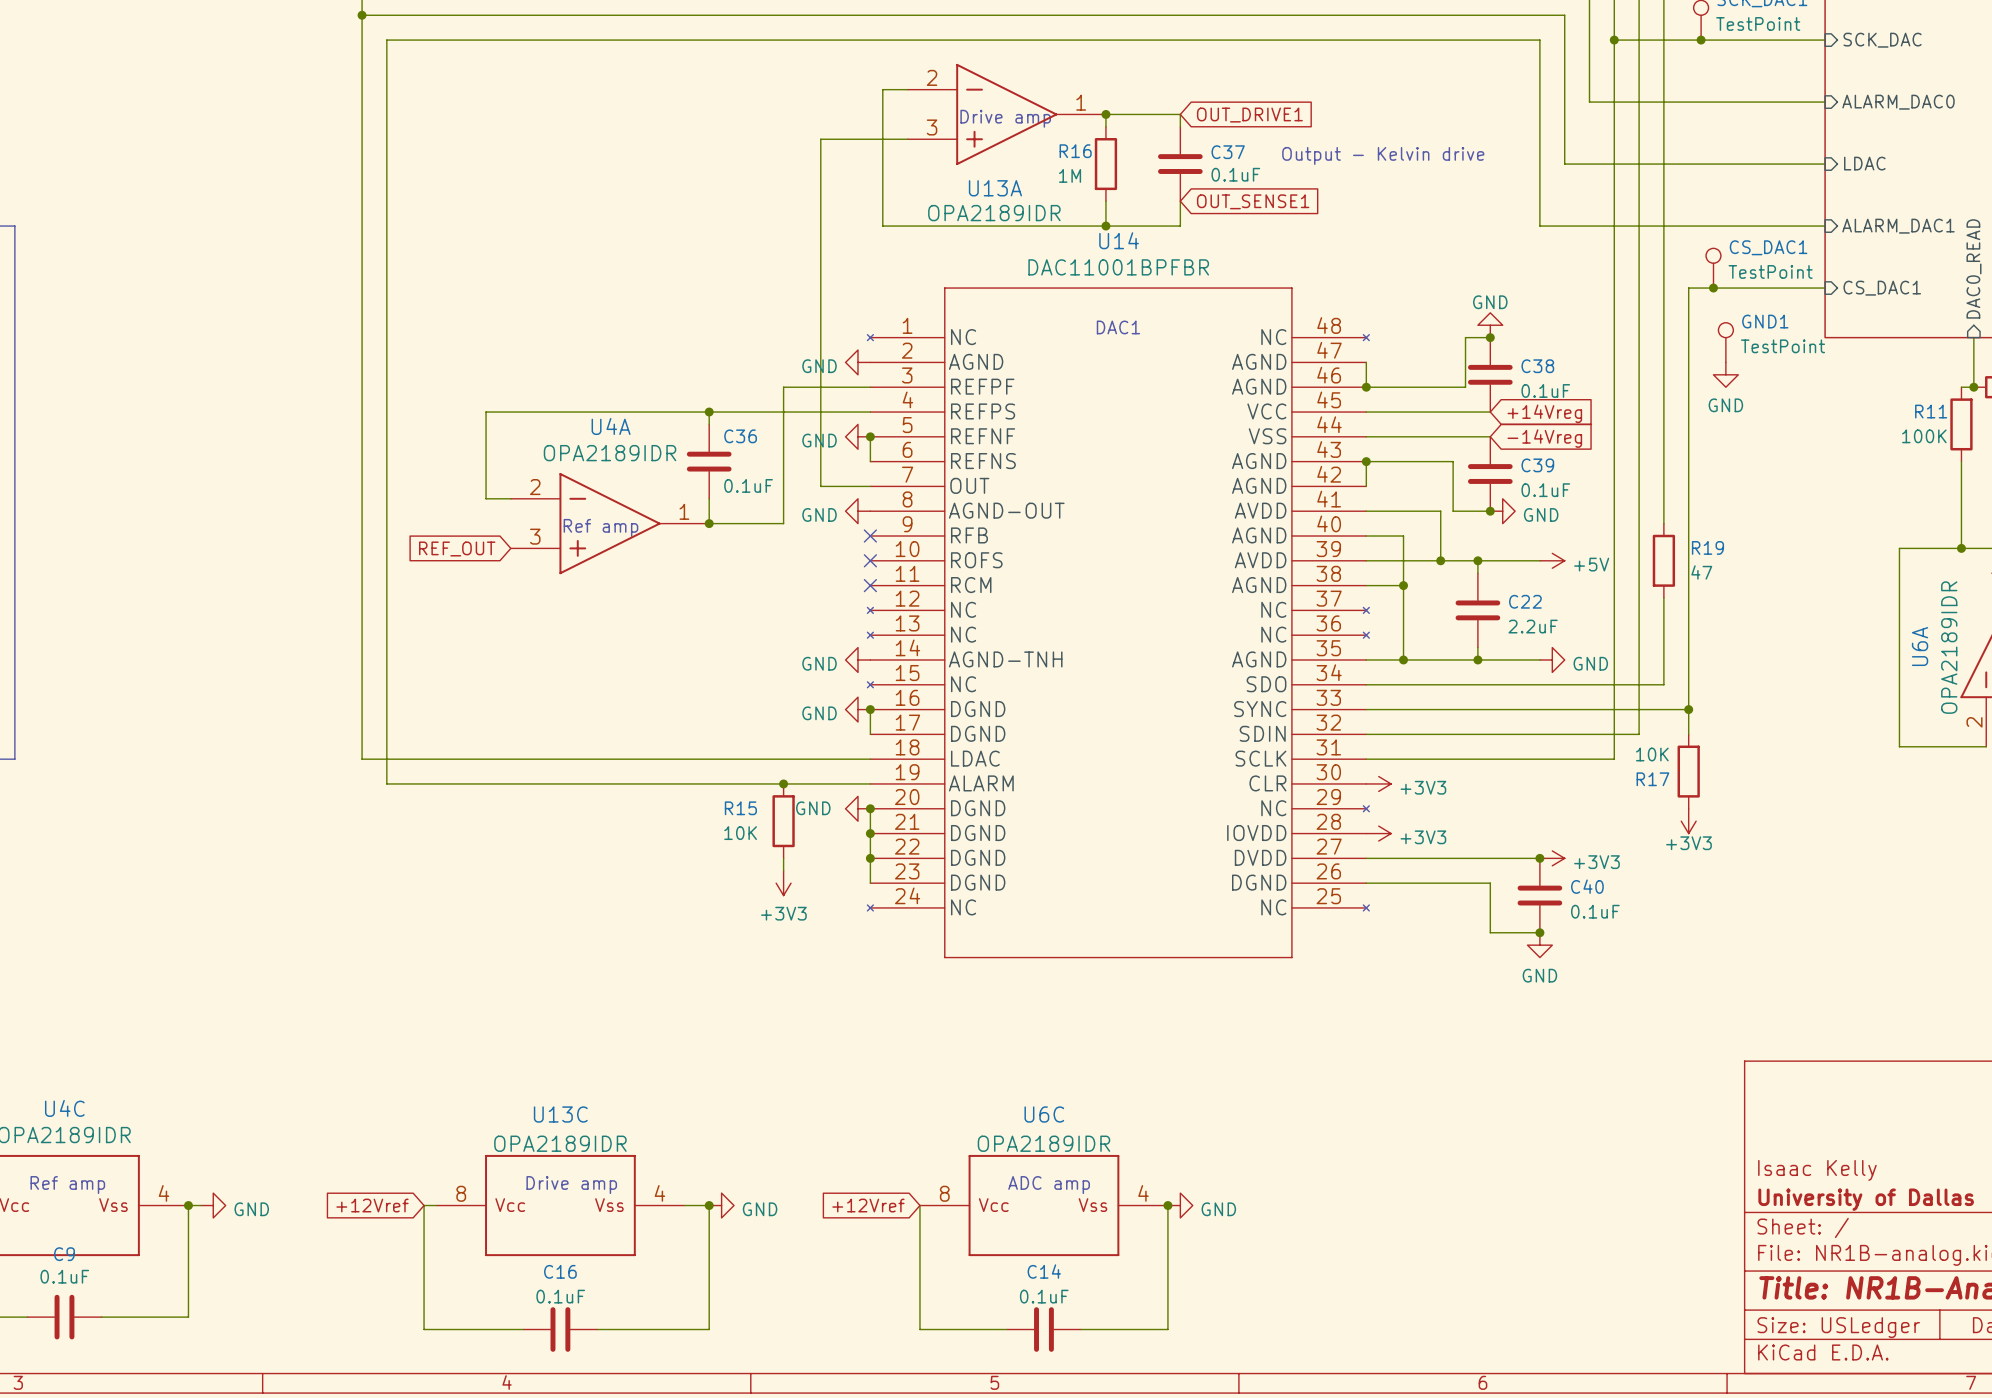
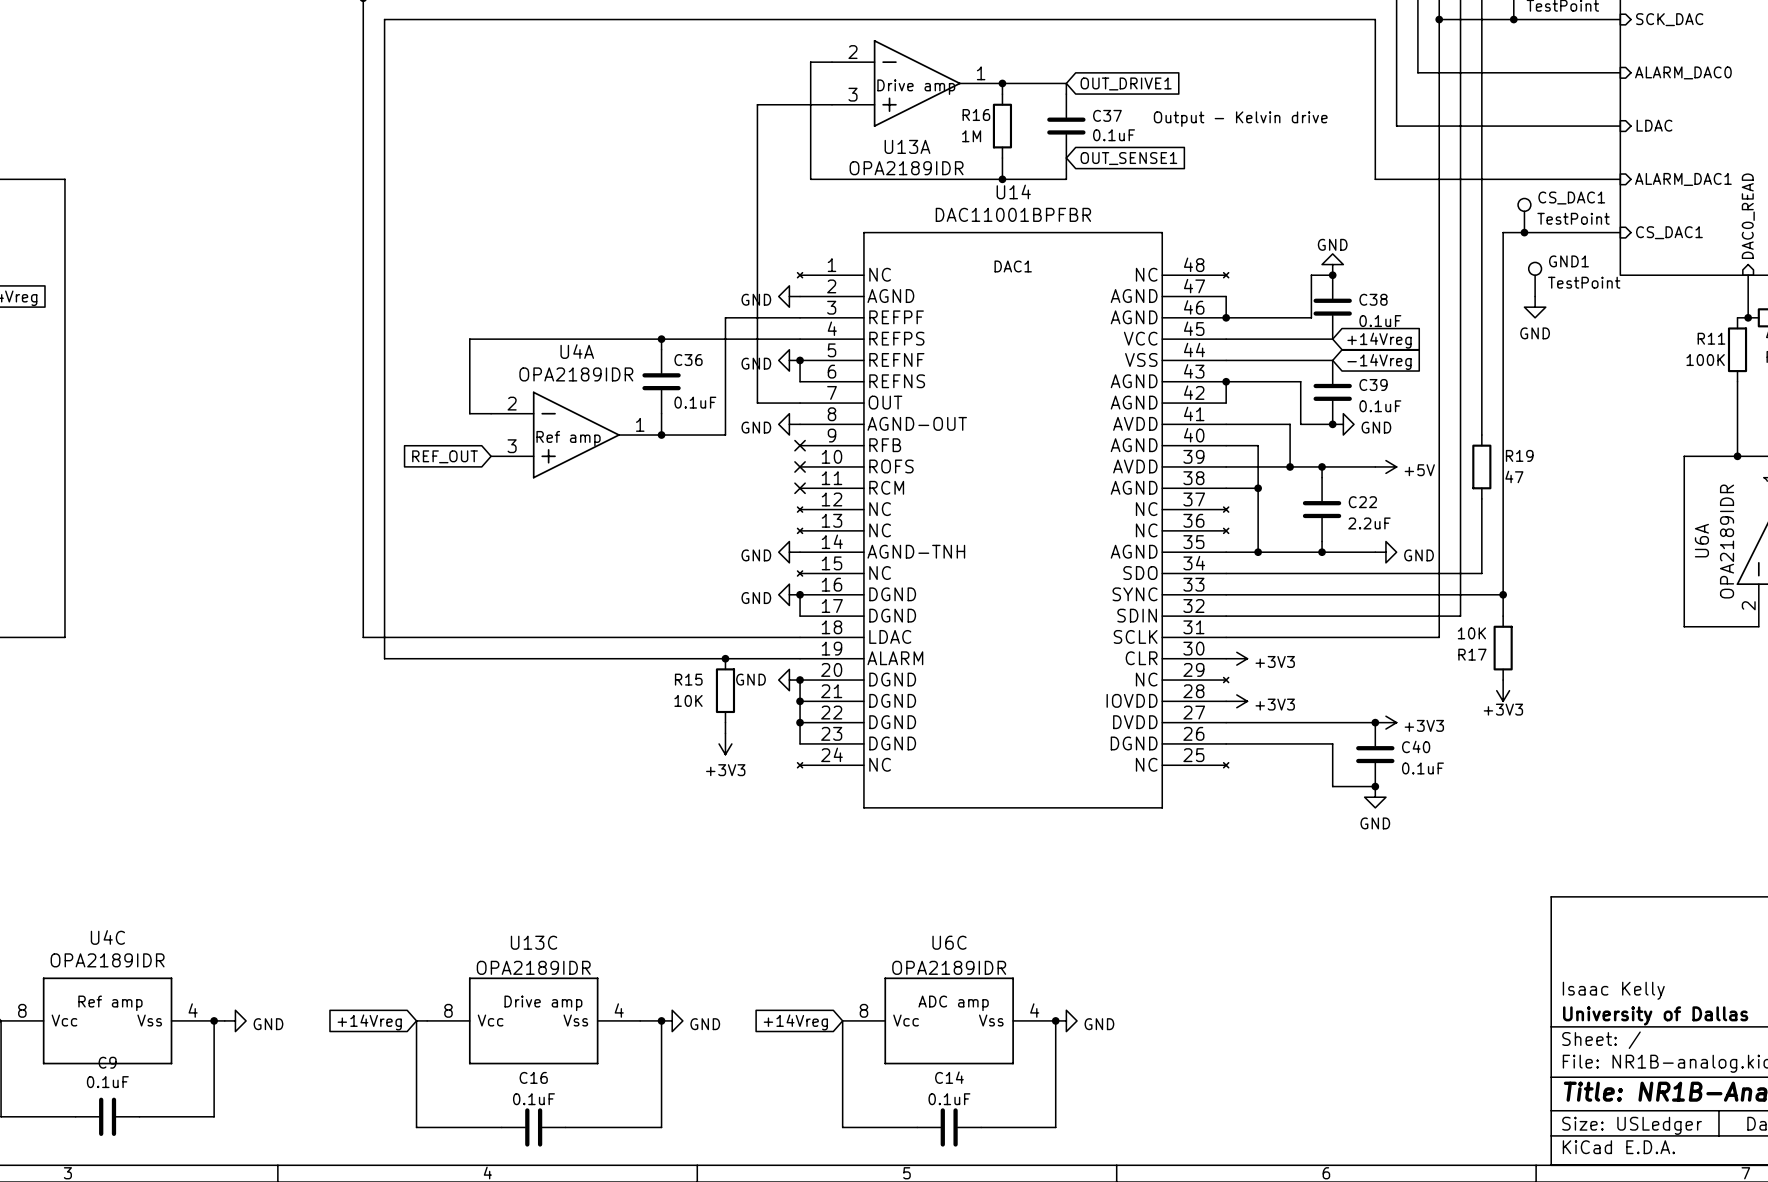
global label: +12Vref (372, 1205) -> +14Vreg (369, 1022)
global label: +12Vref (868, 1205) -> +14Vreg (795, 1022)

